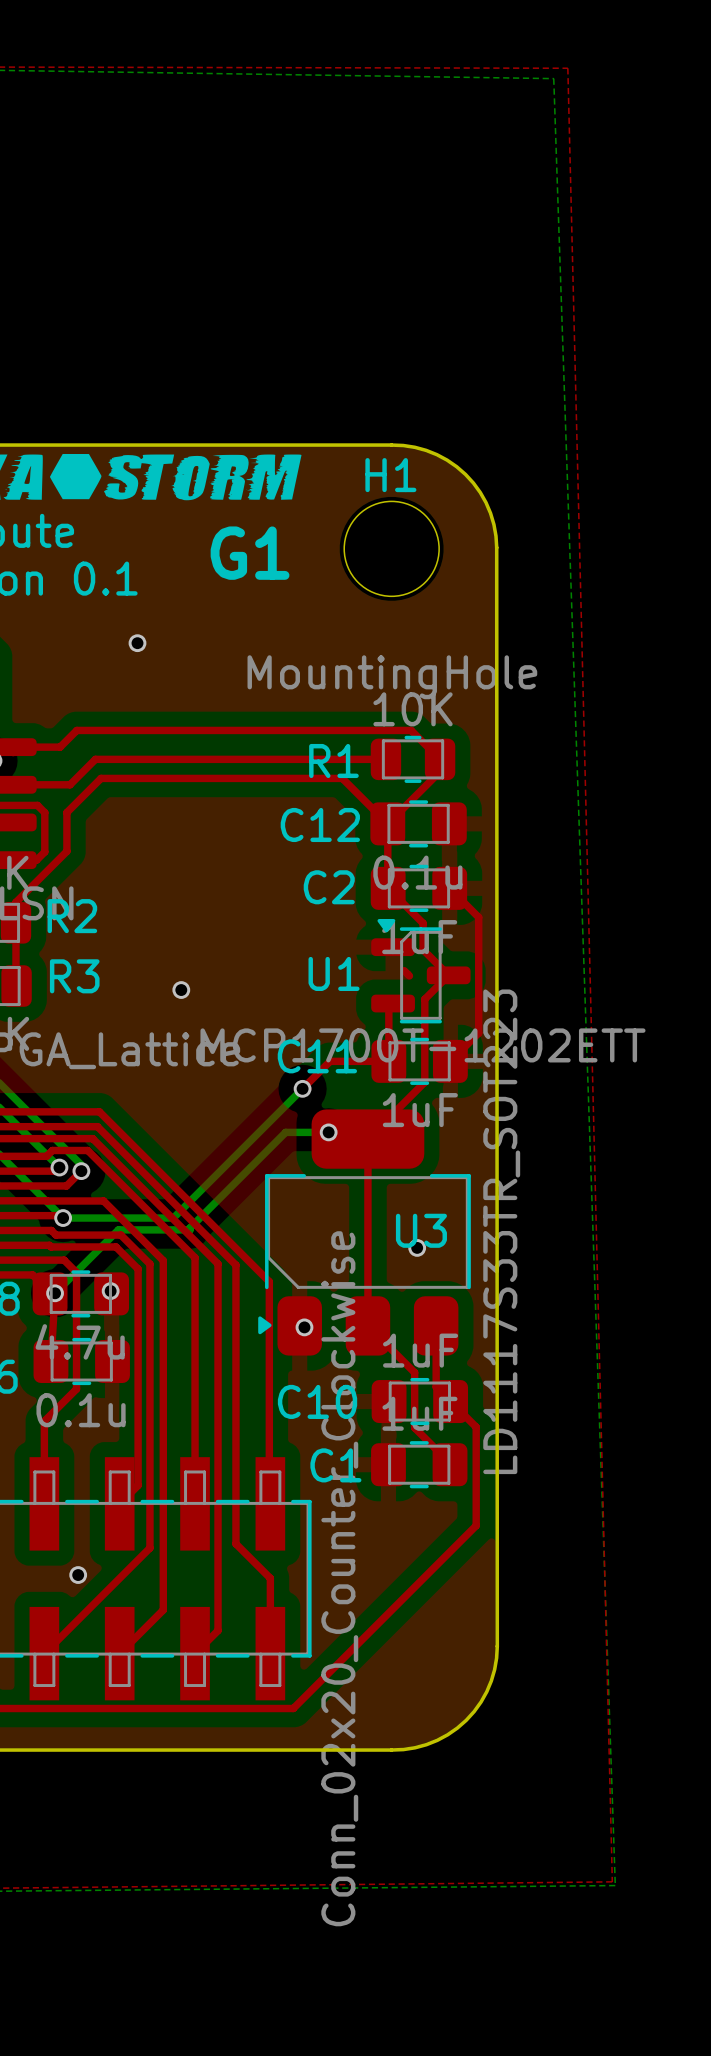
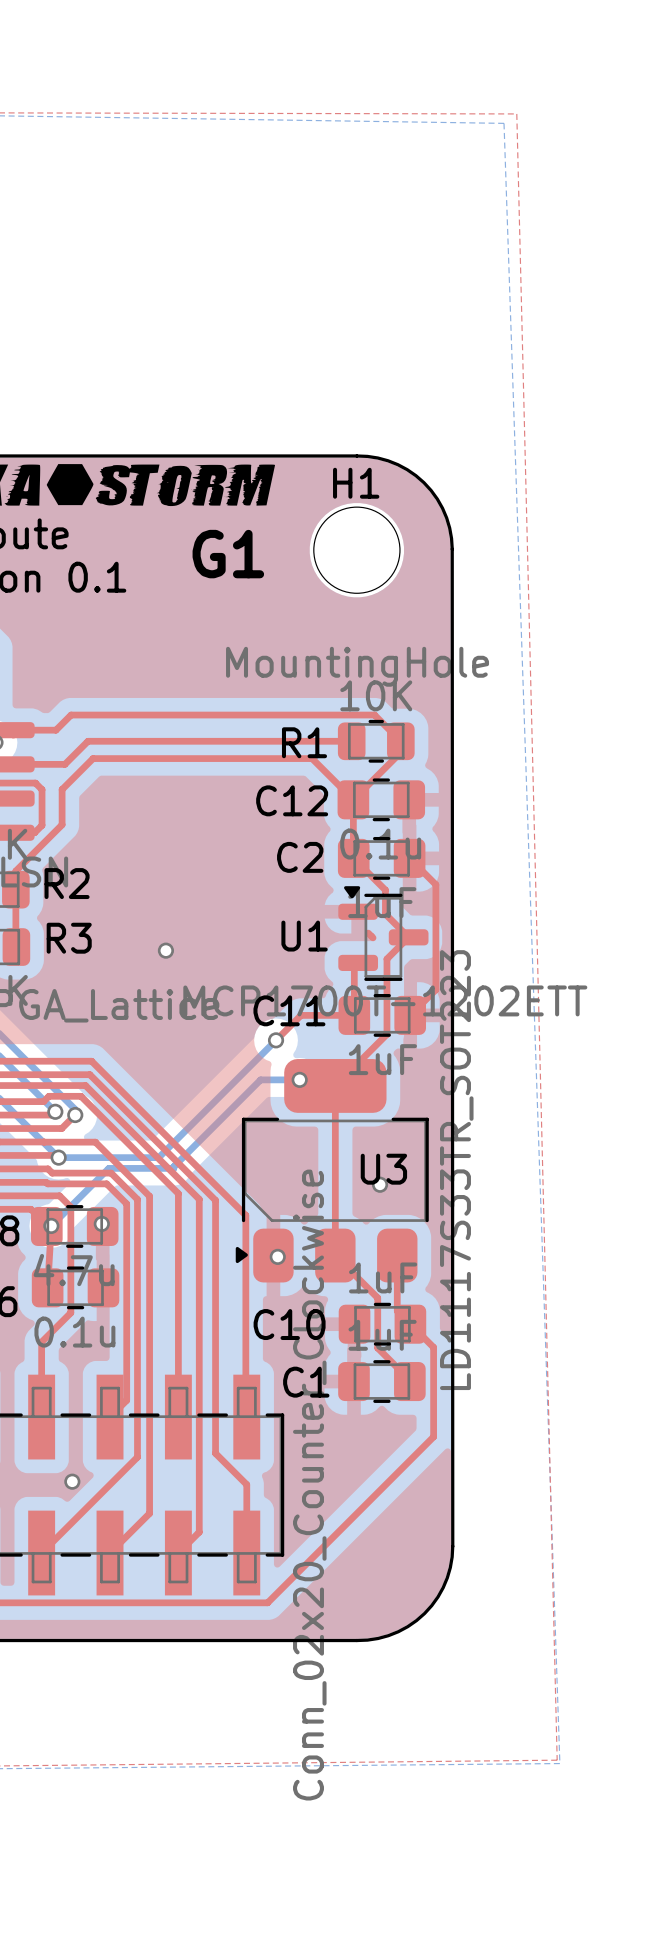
via: (137, 643) -> none

